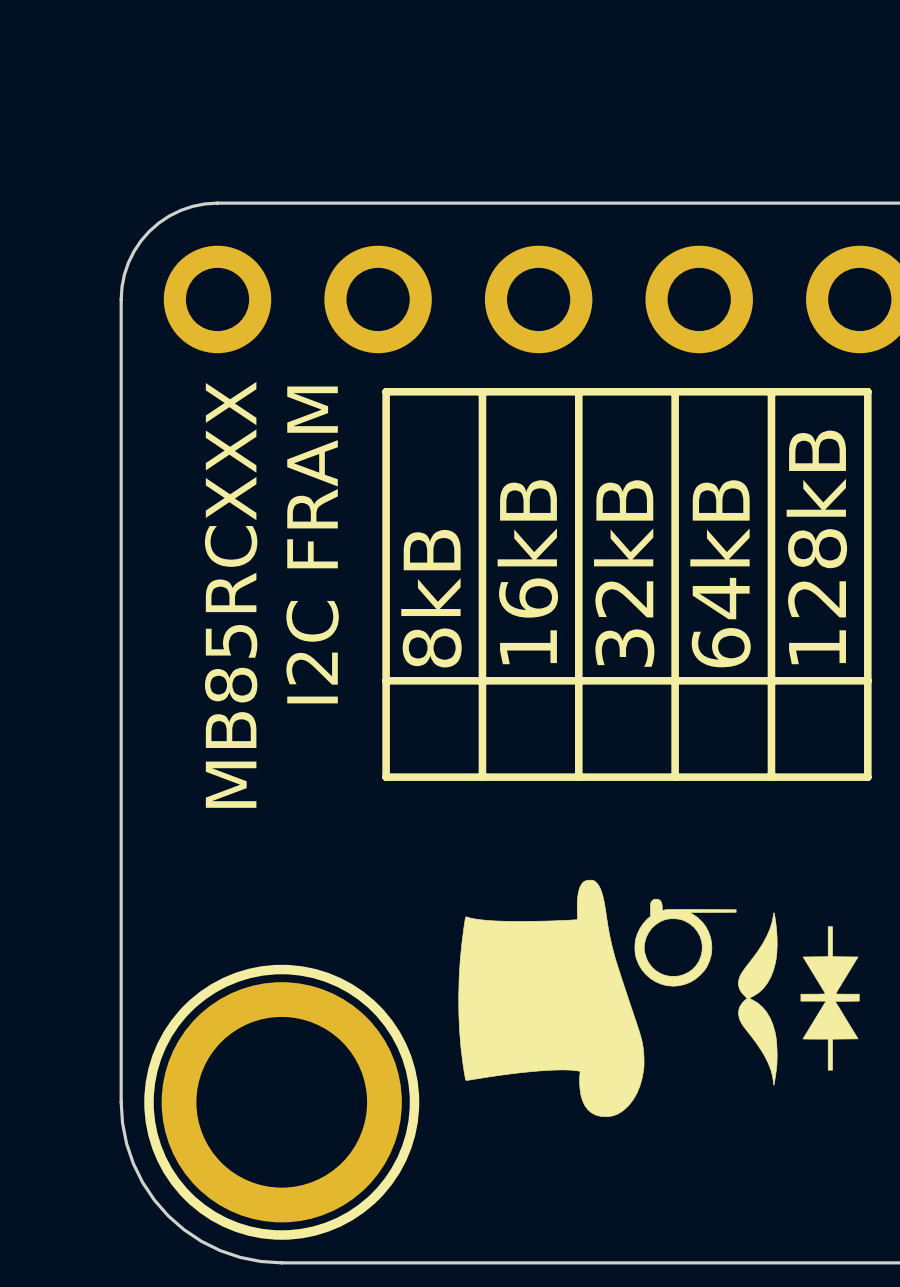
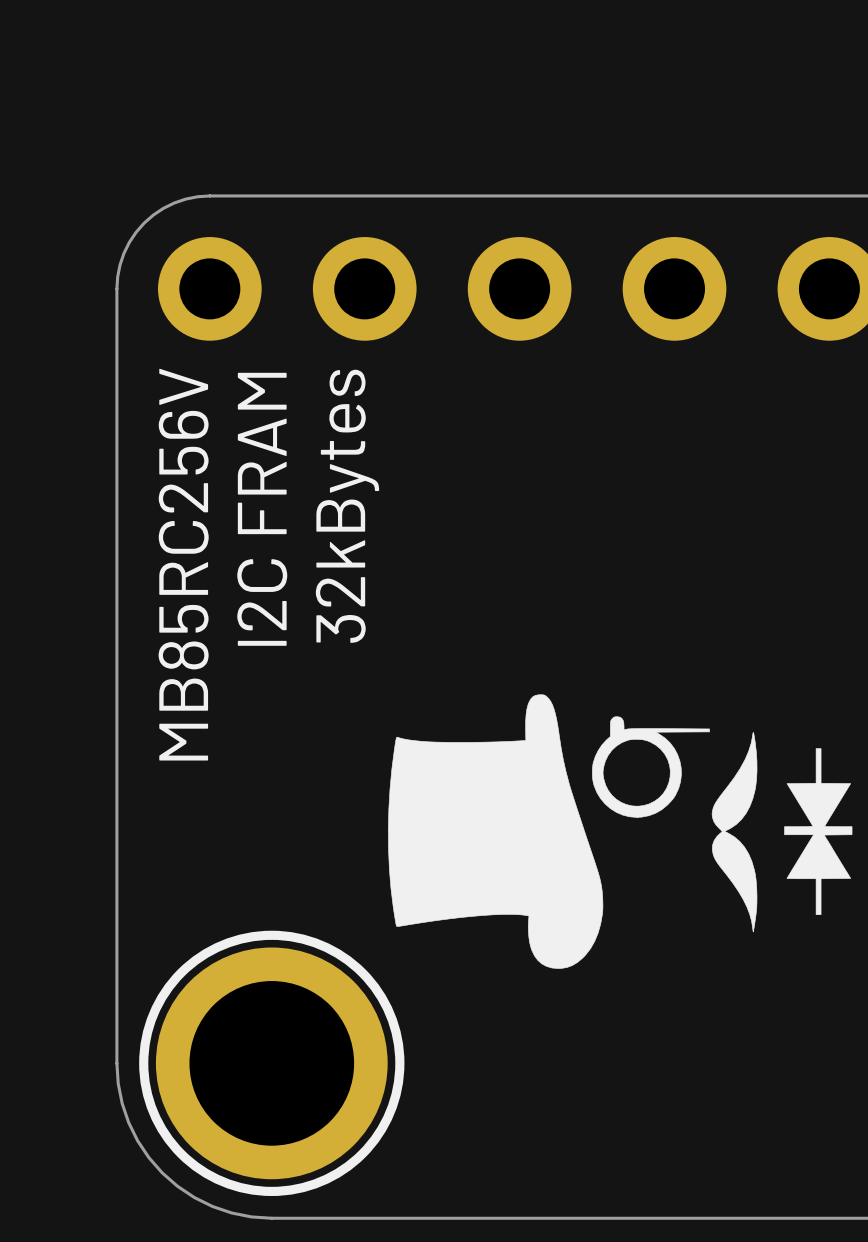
line: (482, 391) (482, 777) -> none
line: (578, 391) (578, 777) -> none
line: (675, 391) (675, 777) -> none
line: (771, 391) (771, 777) -> none
line: (867, 391) (386, 391) (386, 777) (867, 777) (867, 391) -> none
text: none -> 32kBytes (347, 506)
text position: I2C FRAM (312, 544) -> I2C FRAM (262, 509)
text: 128kB (816, 547) -> none
text: 16kB (527, 572) -> none
text: 32kB (624, 573) -> none
text: 64kB (720, 573) -> none
text: MB85RCXXX (231, 594) -> MB85RC256V (183, 564)
text: 8kB (431, 598) -> none
line: (867, 680) (386, 680) -> none
drawing: none -> [388, 694, 853, 969]
drawing: [458, 879, 860, 1118] -> none

